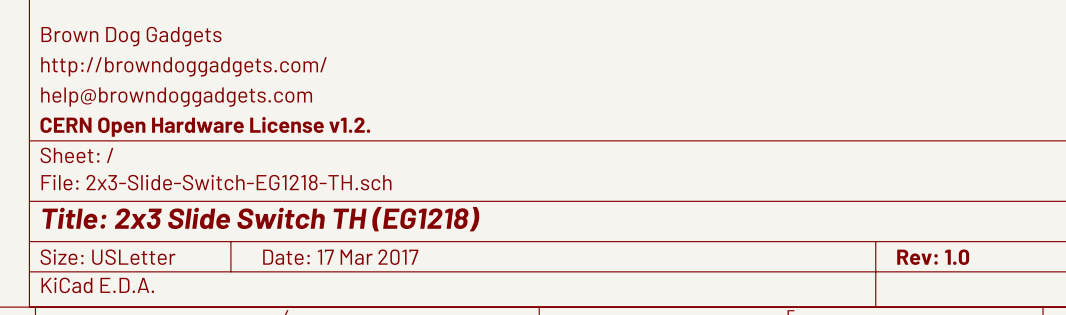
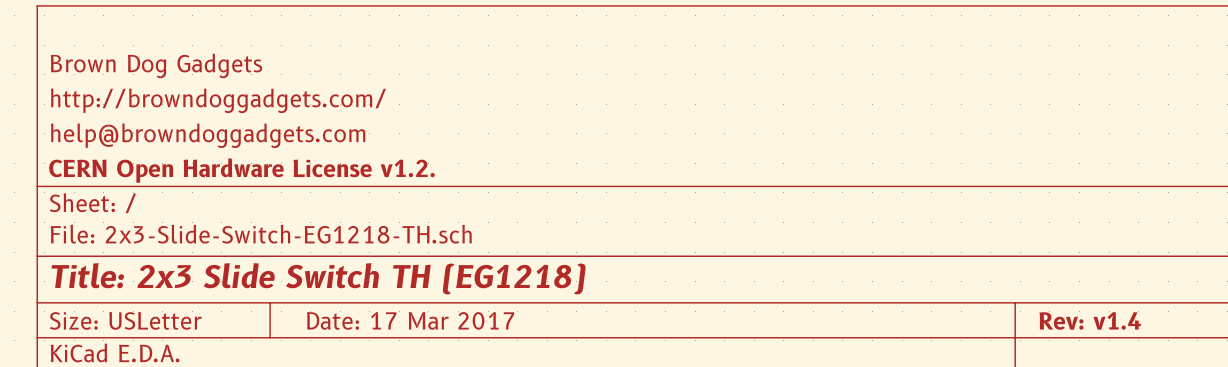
title block: Rev: 1.0 (933, 257) -> Rev: v1.4 (1090, 320)

